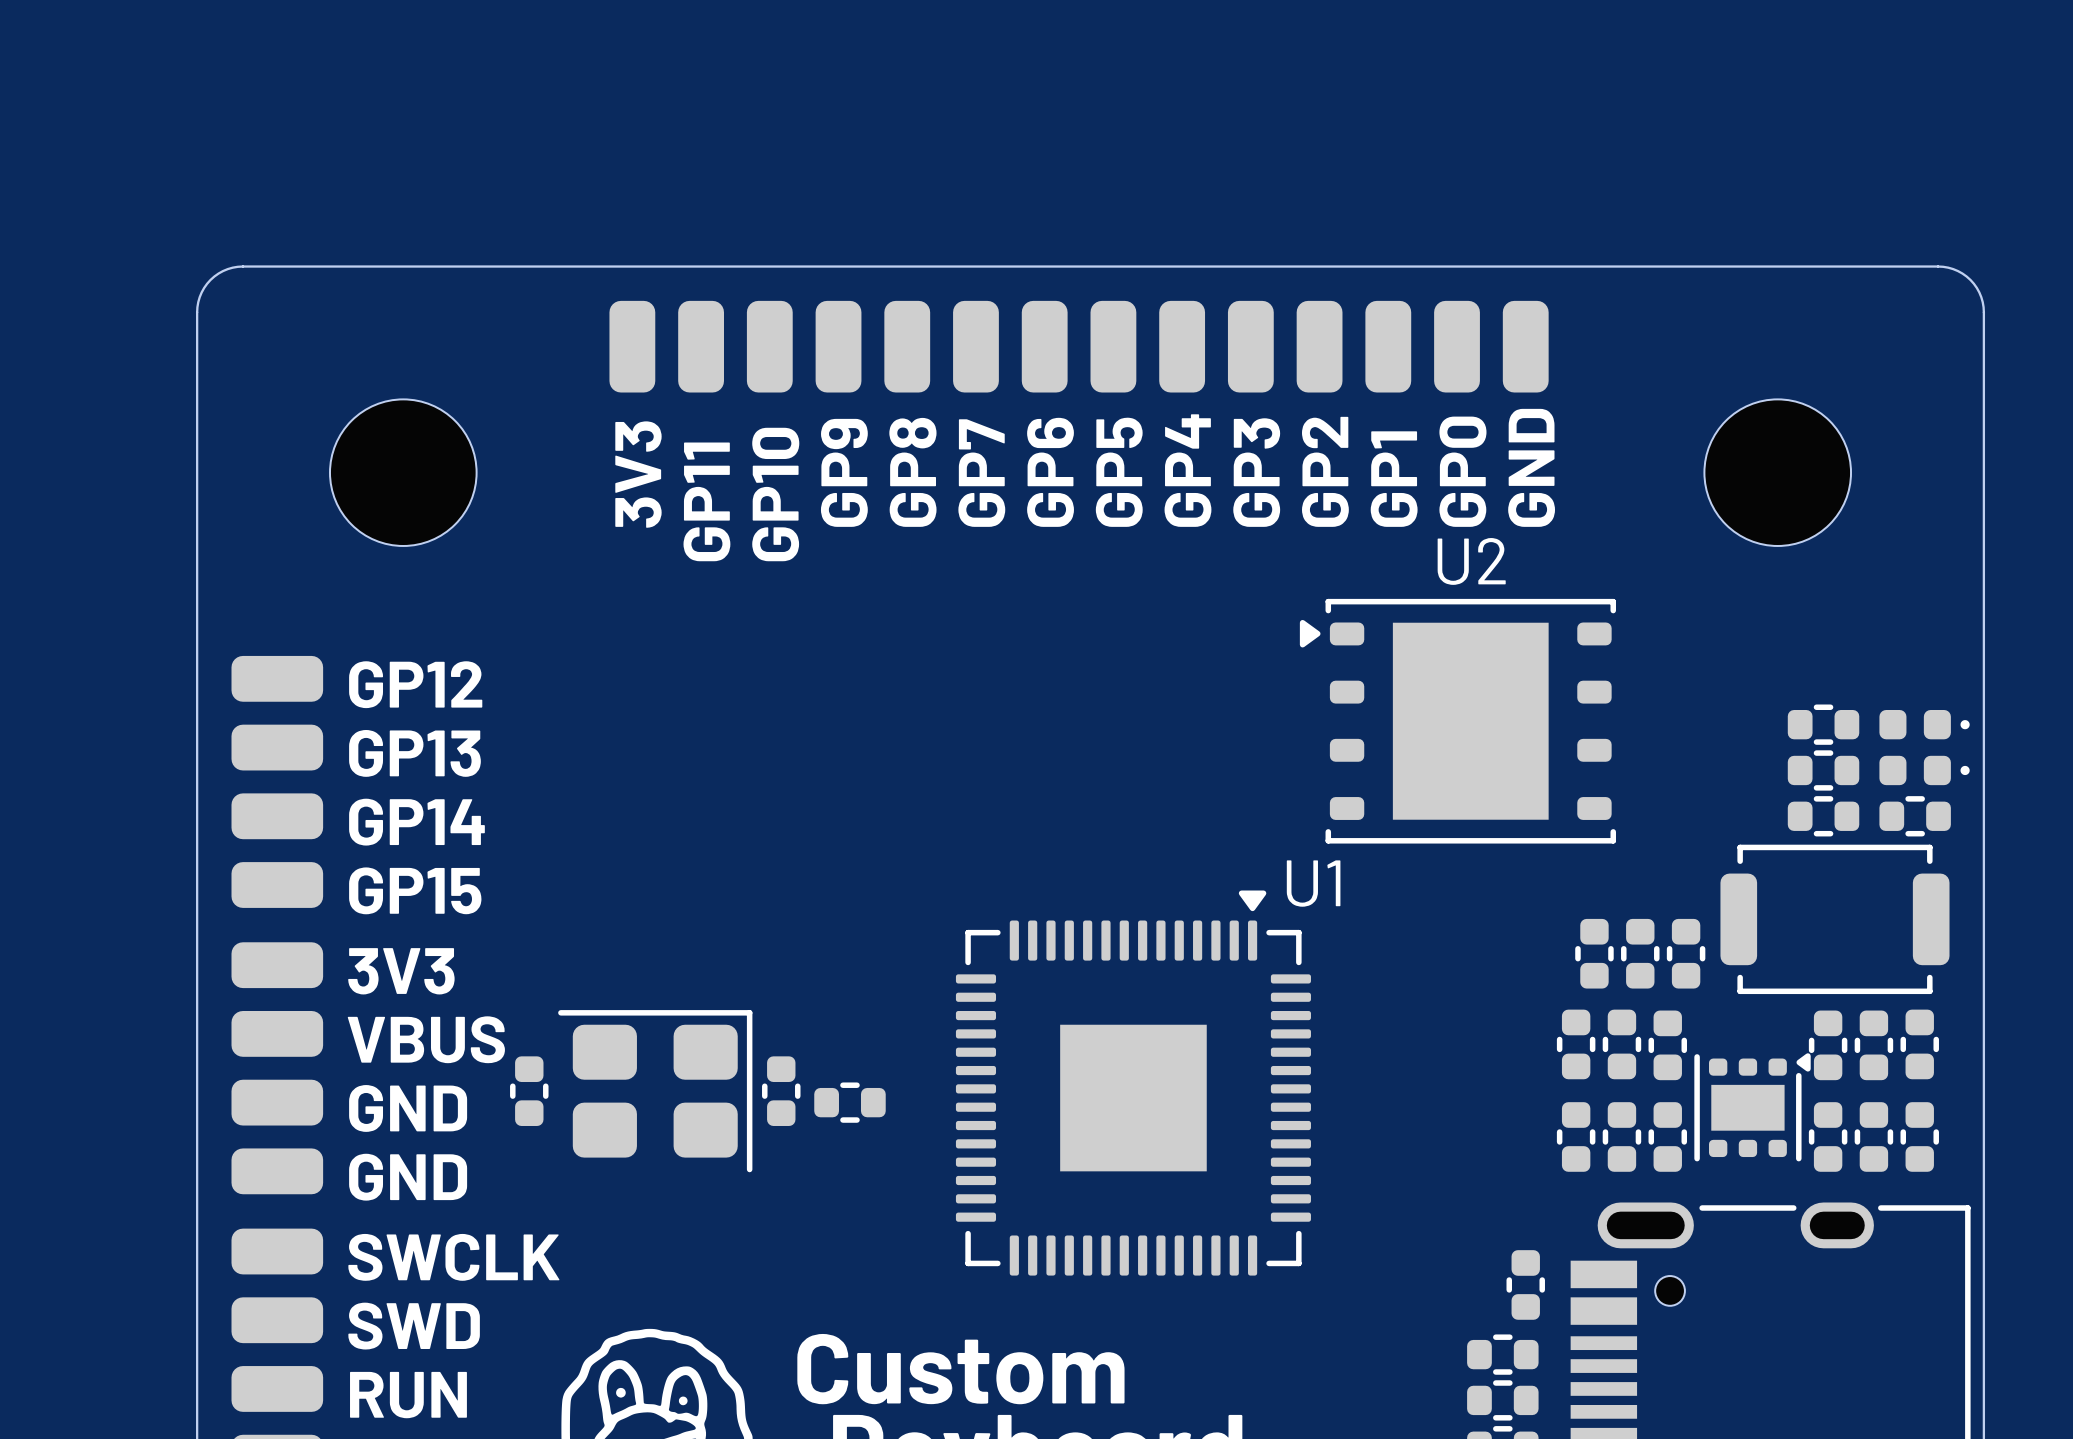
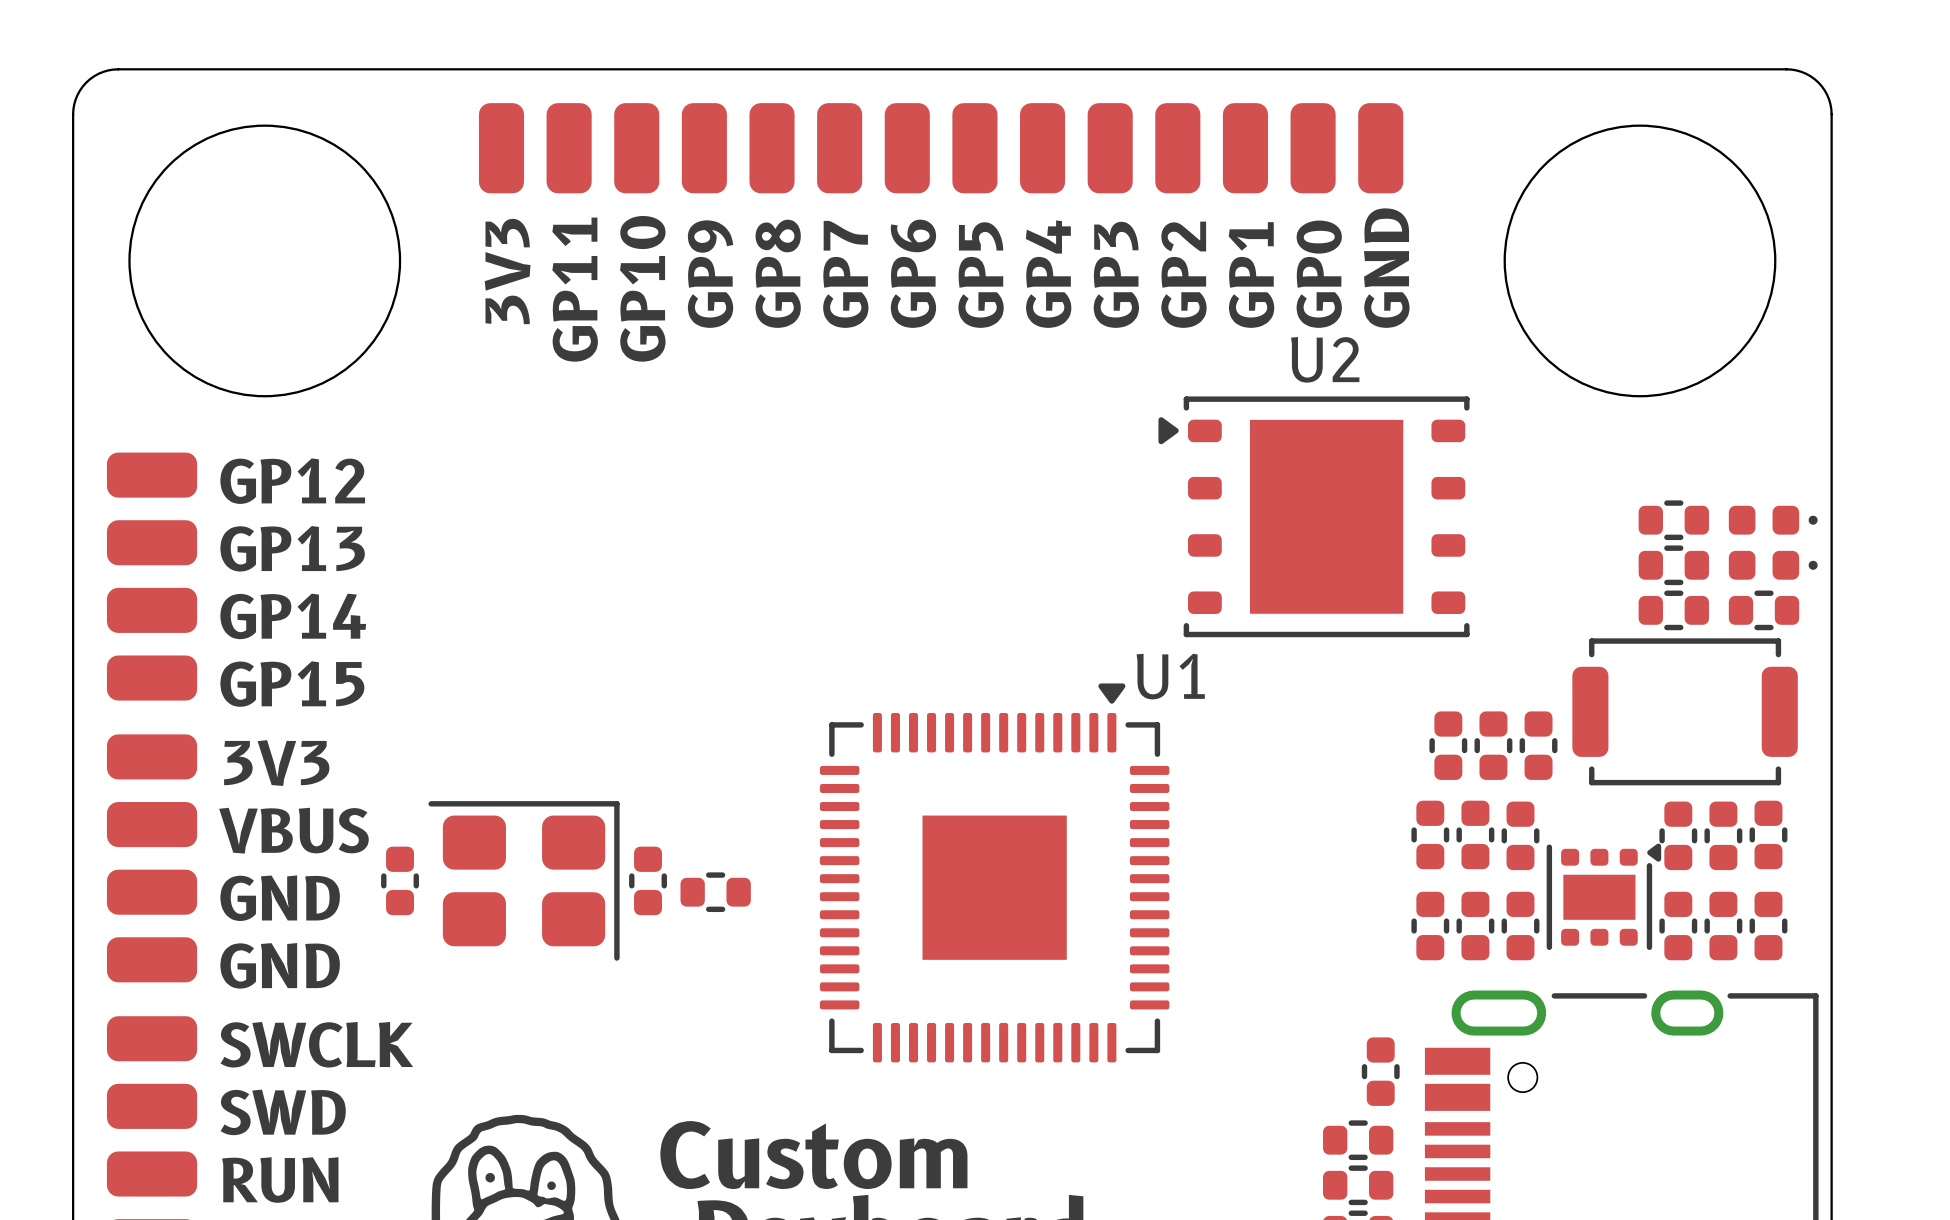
round board edge: none -> [128, 124, 402, 398]
round board edge: none -> [1503, 124, 1777, 398]
part: (403, 472) -> none
part: (1777, 472) -> none

